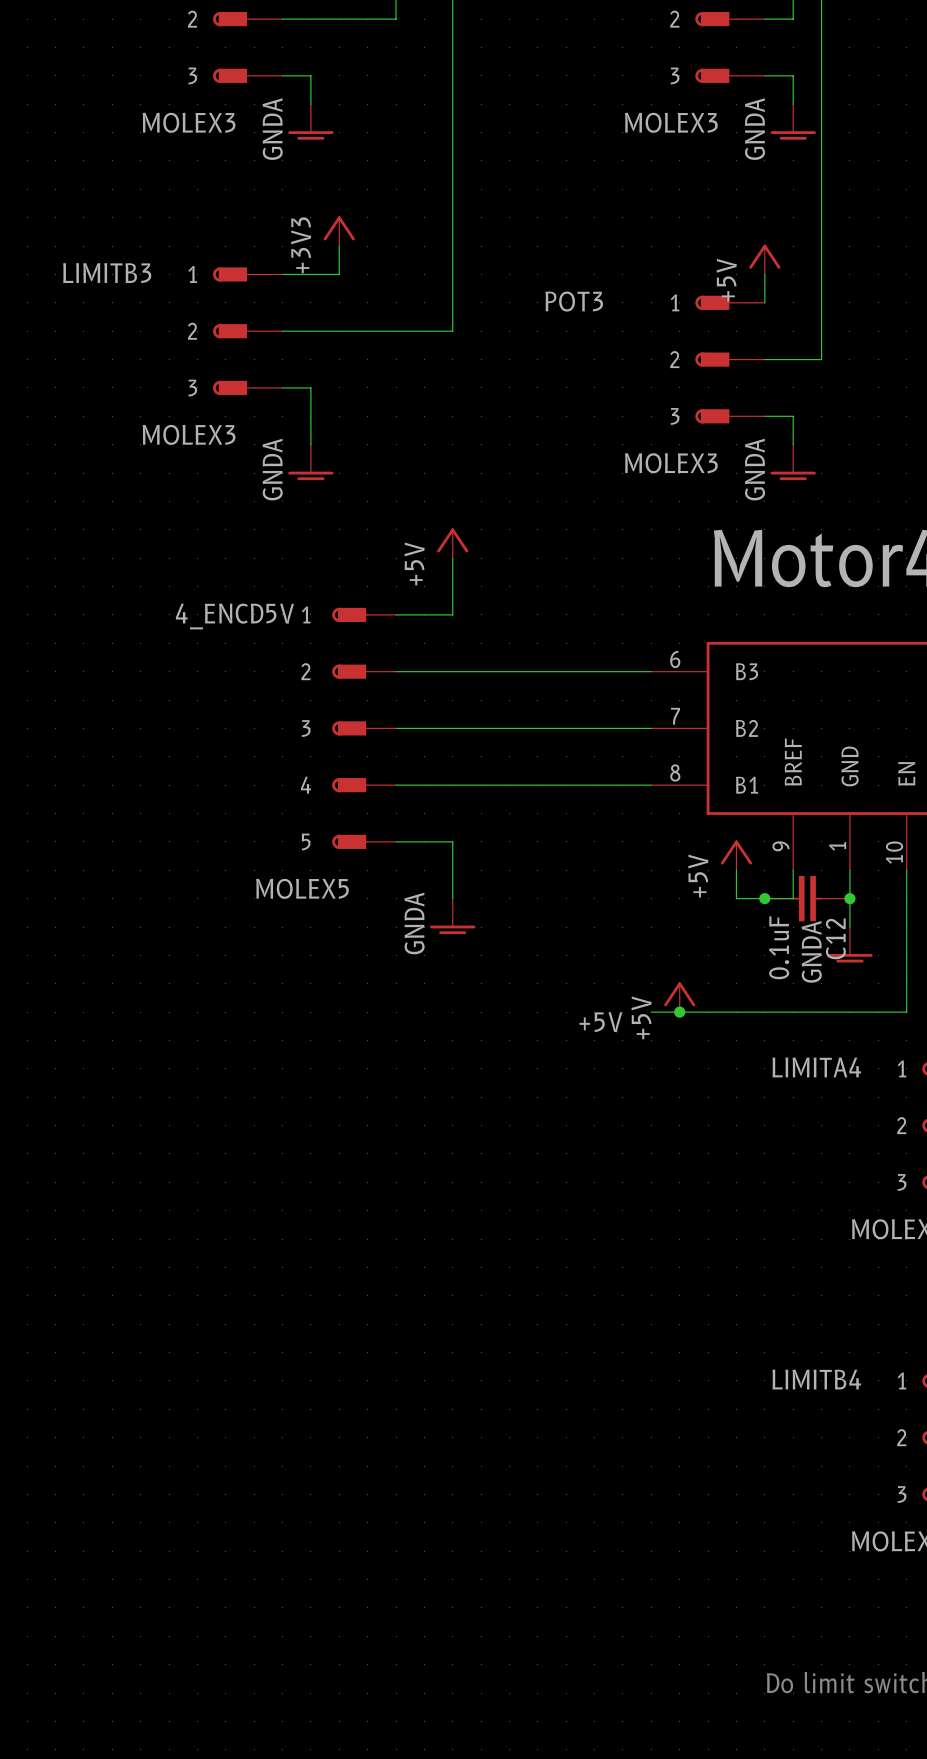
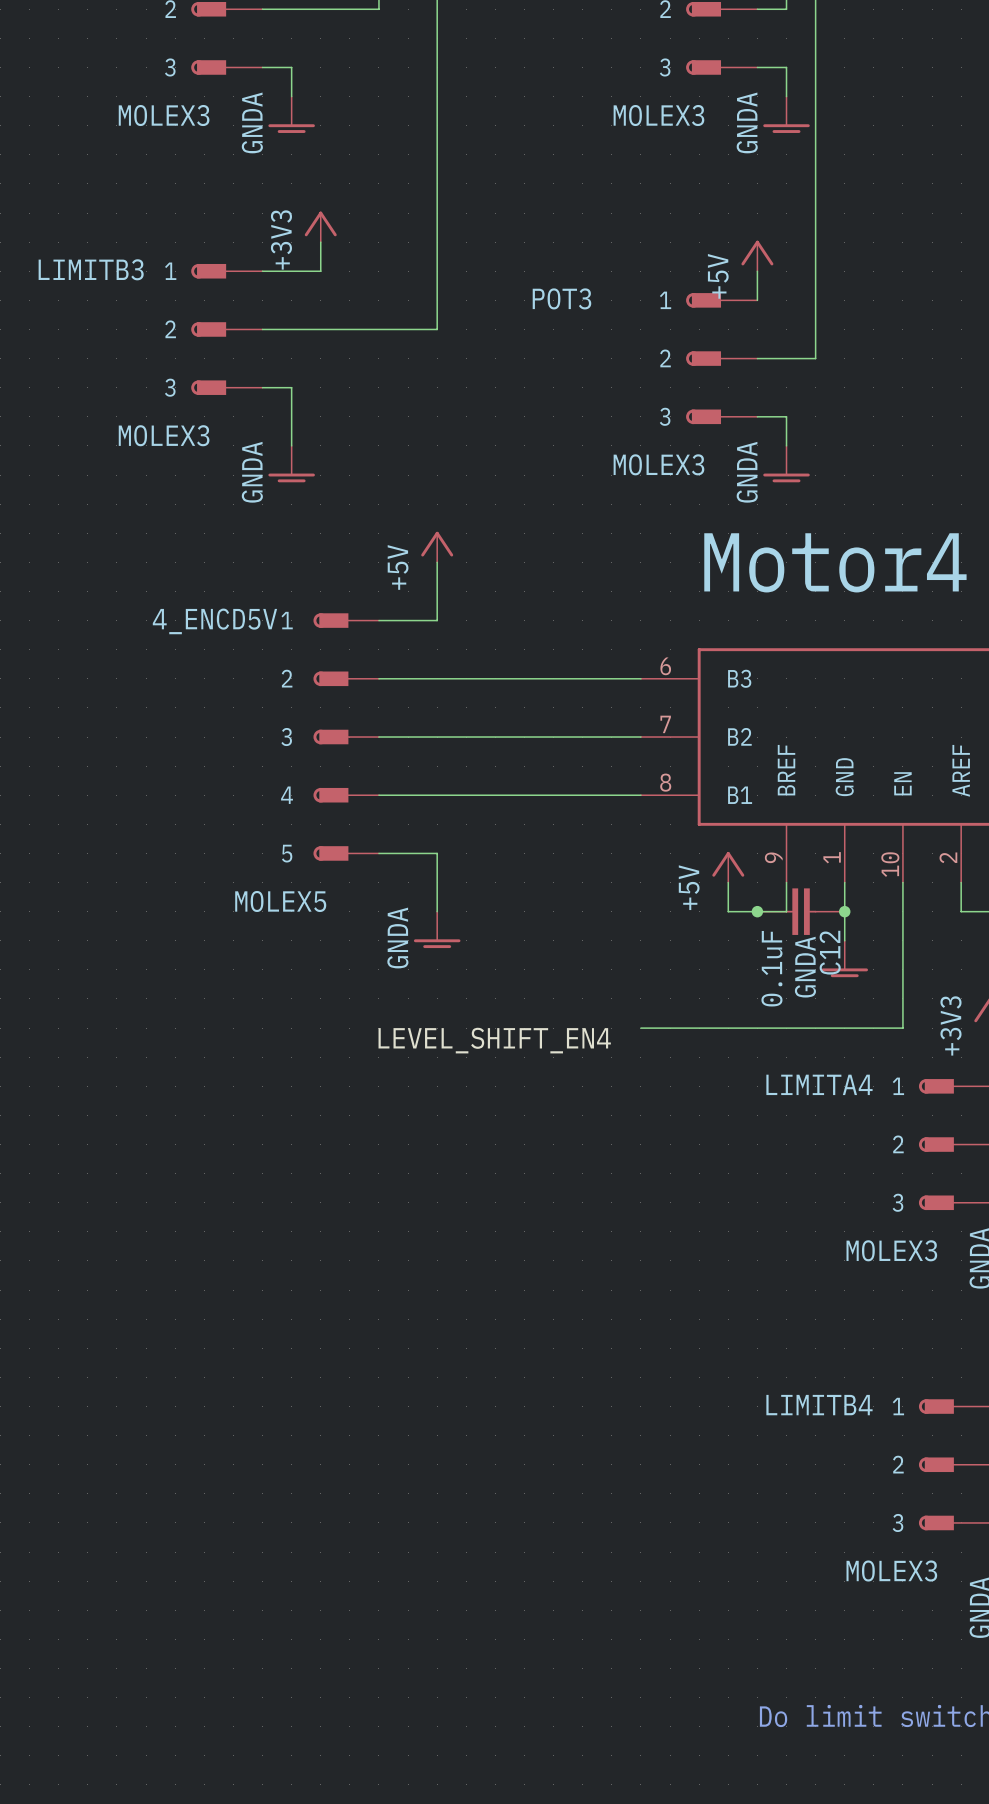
power symbol: +5V (679, 997) -> none
junction: (679, 1012) -> none
label: +5V (600, 1022) -> LEVEL_SHIFT_EN4 (494, 1040)

